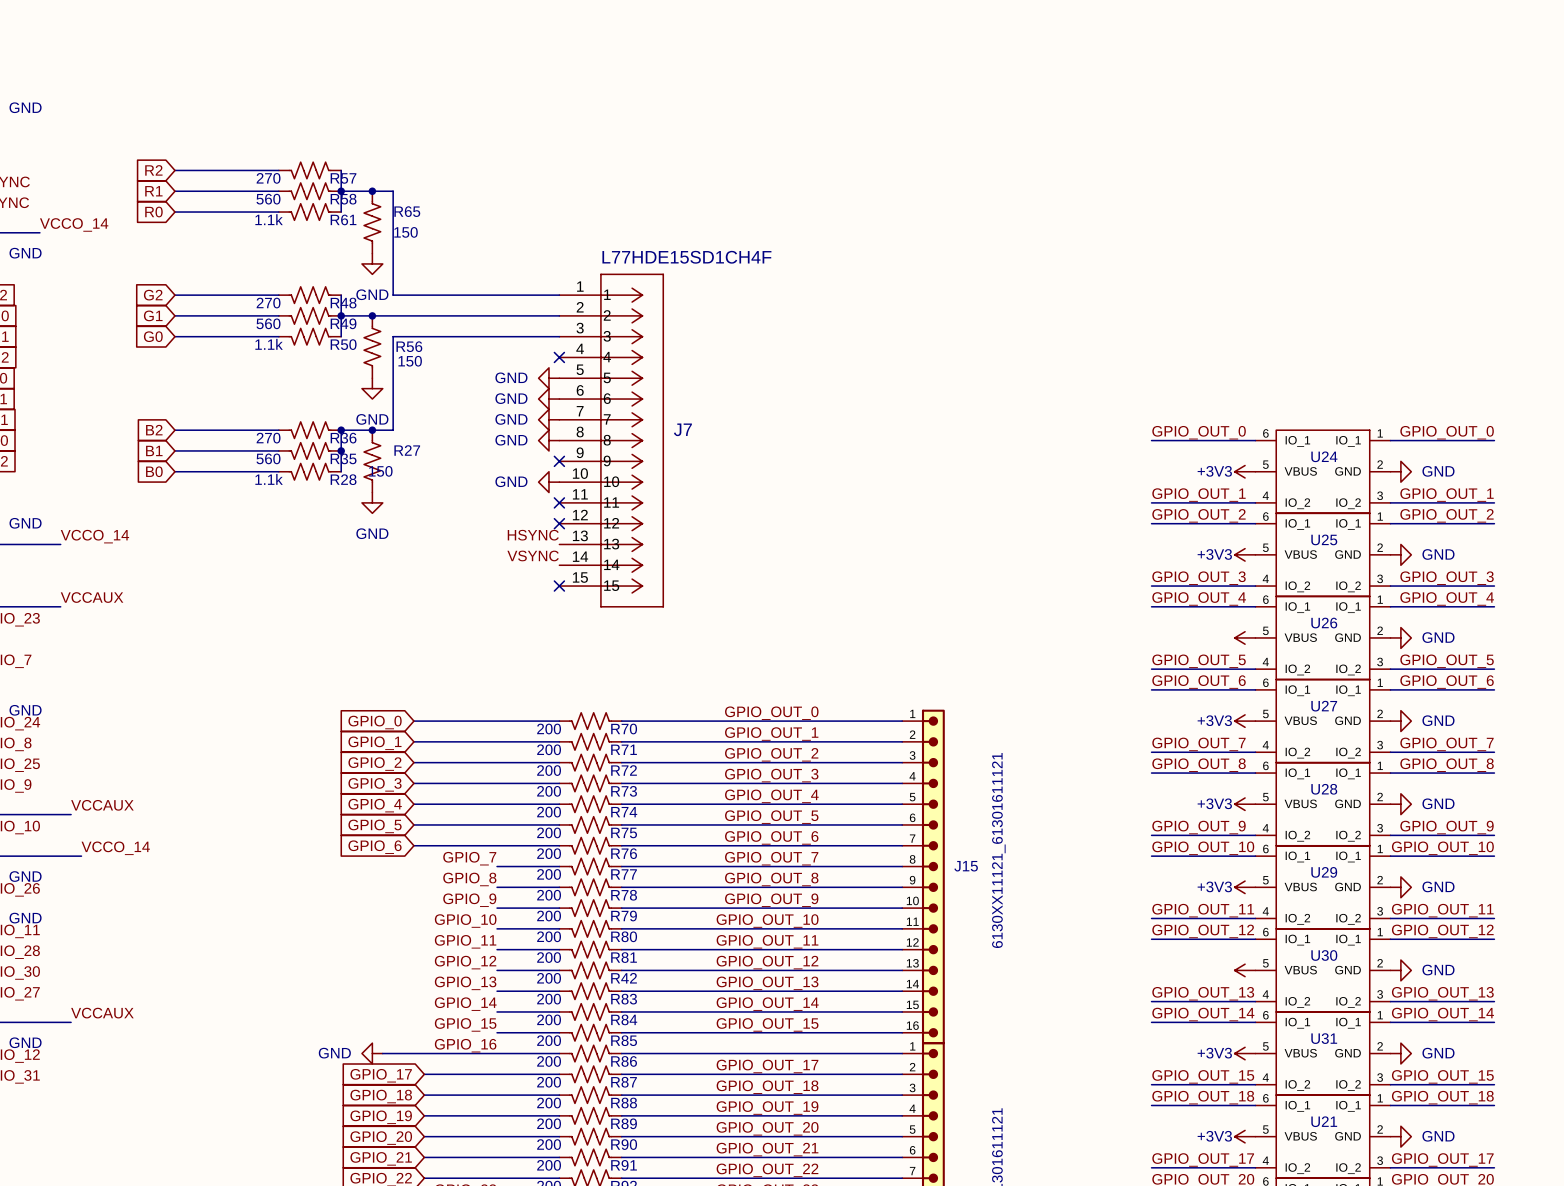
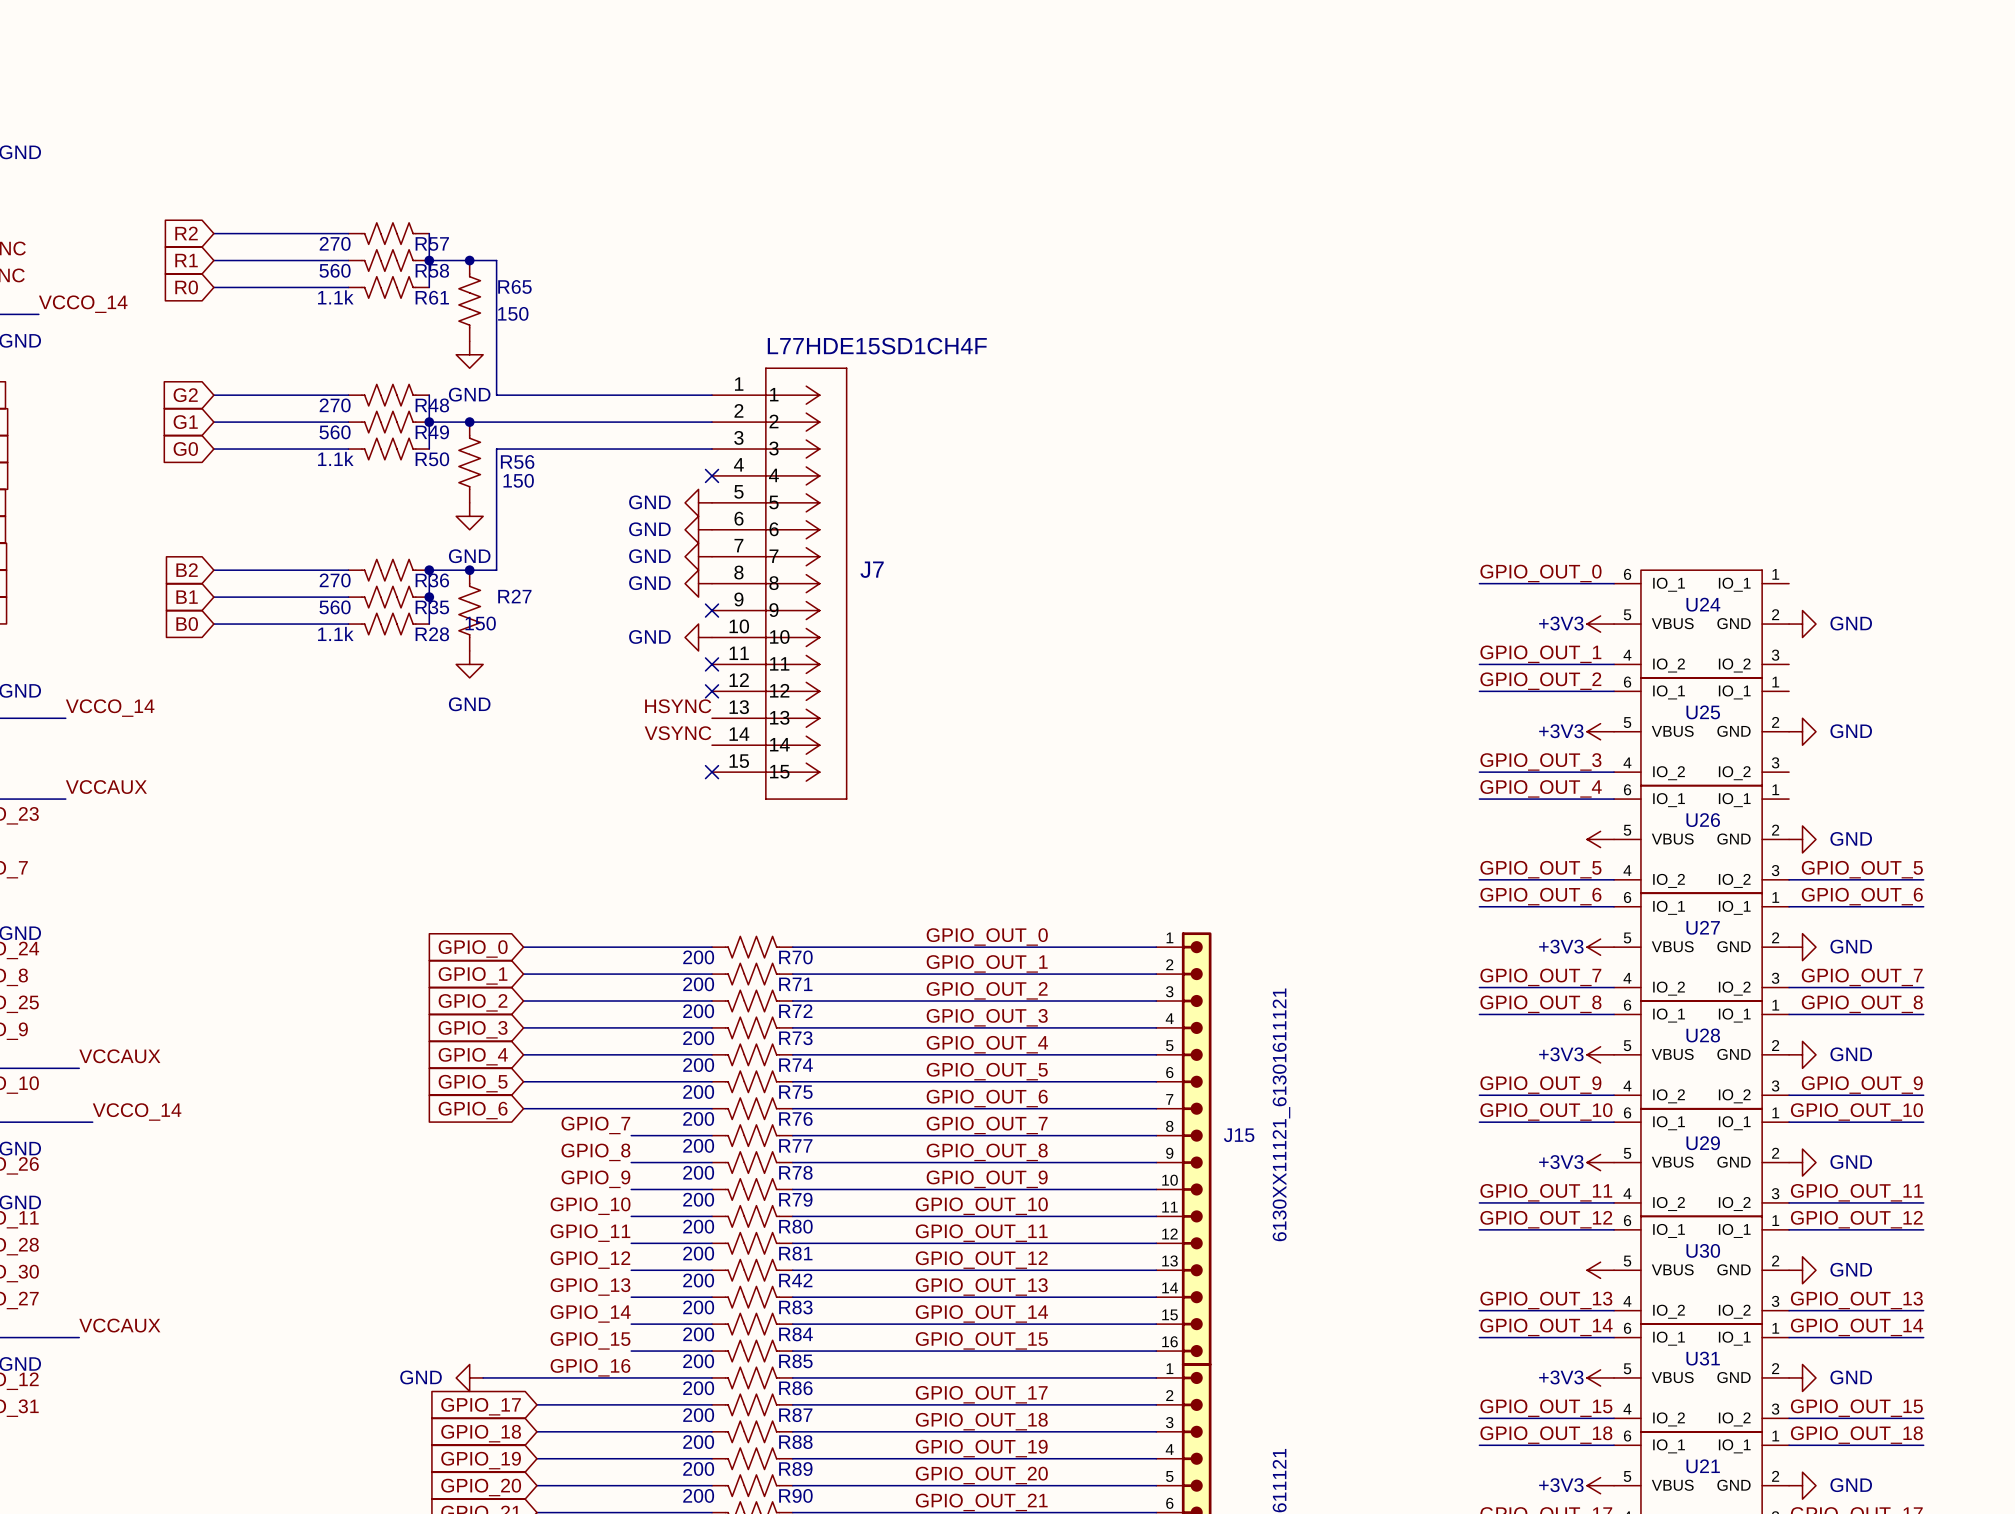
label: GPIO_OUT_0 (1447, 432) -> none
wire: (1390, 440) (1494, 440) -> none
label: GPIO_OUT_1 (1447, 495) -> none
wire: (1390, 502) (1494, 502) -> none
label: GPIO_OUT_2 (1446, 515) -> none
wire: (1390, 523) (1494, 523) -> none
label: GPIO_OUT_3 (1447, 578) -> none
wire: (1390, 586) (1494, 586) -> none
label: GPIO_OUT_4 (1447, 598) -> none
wire: (1390, 606) (1494, 606) -> none

